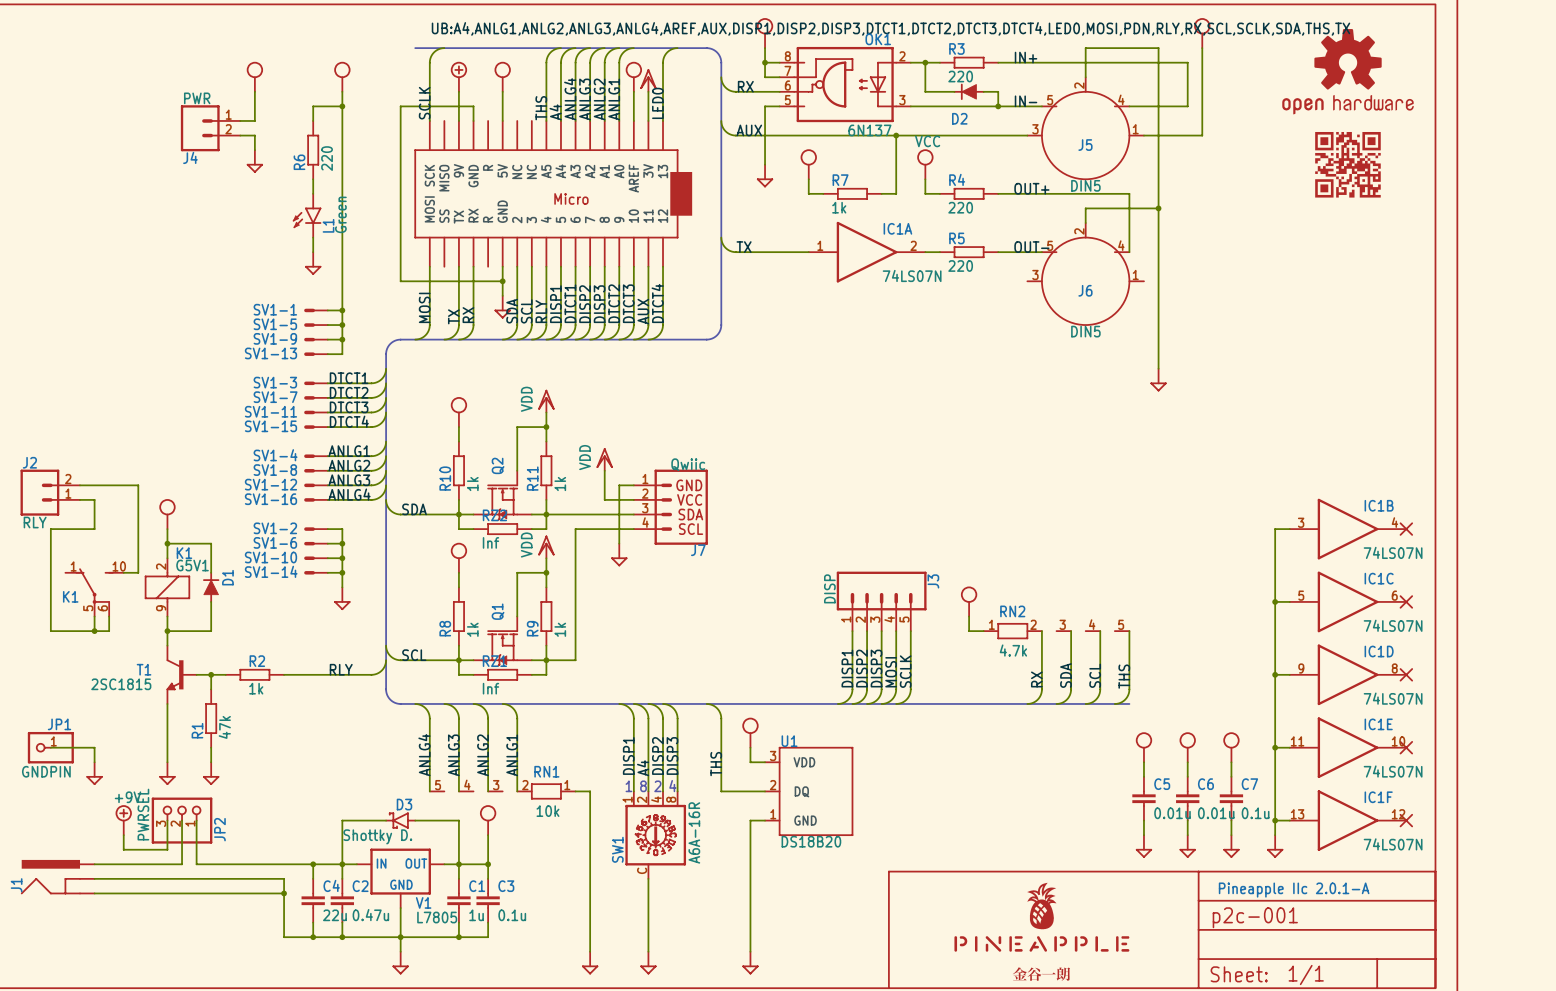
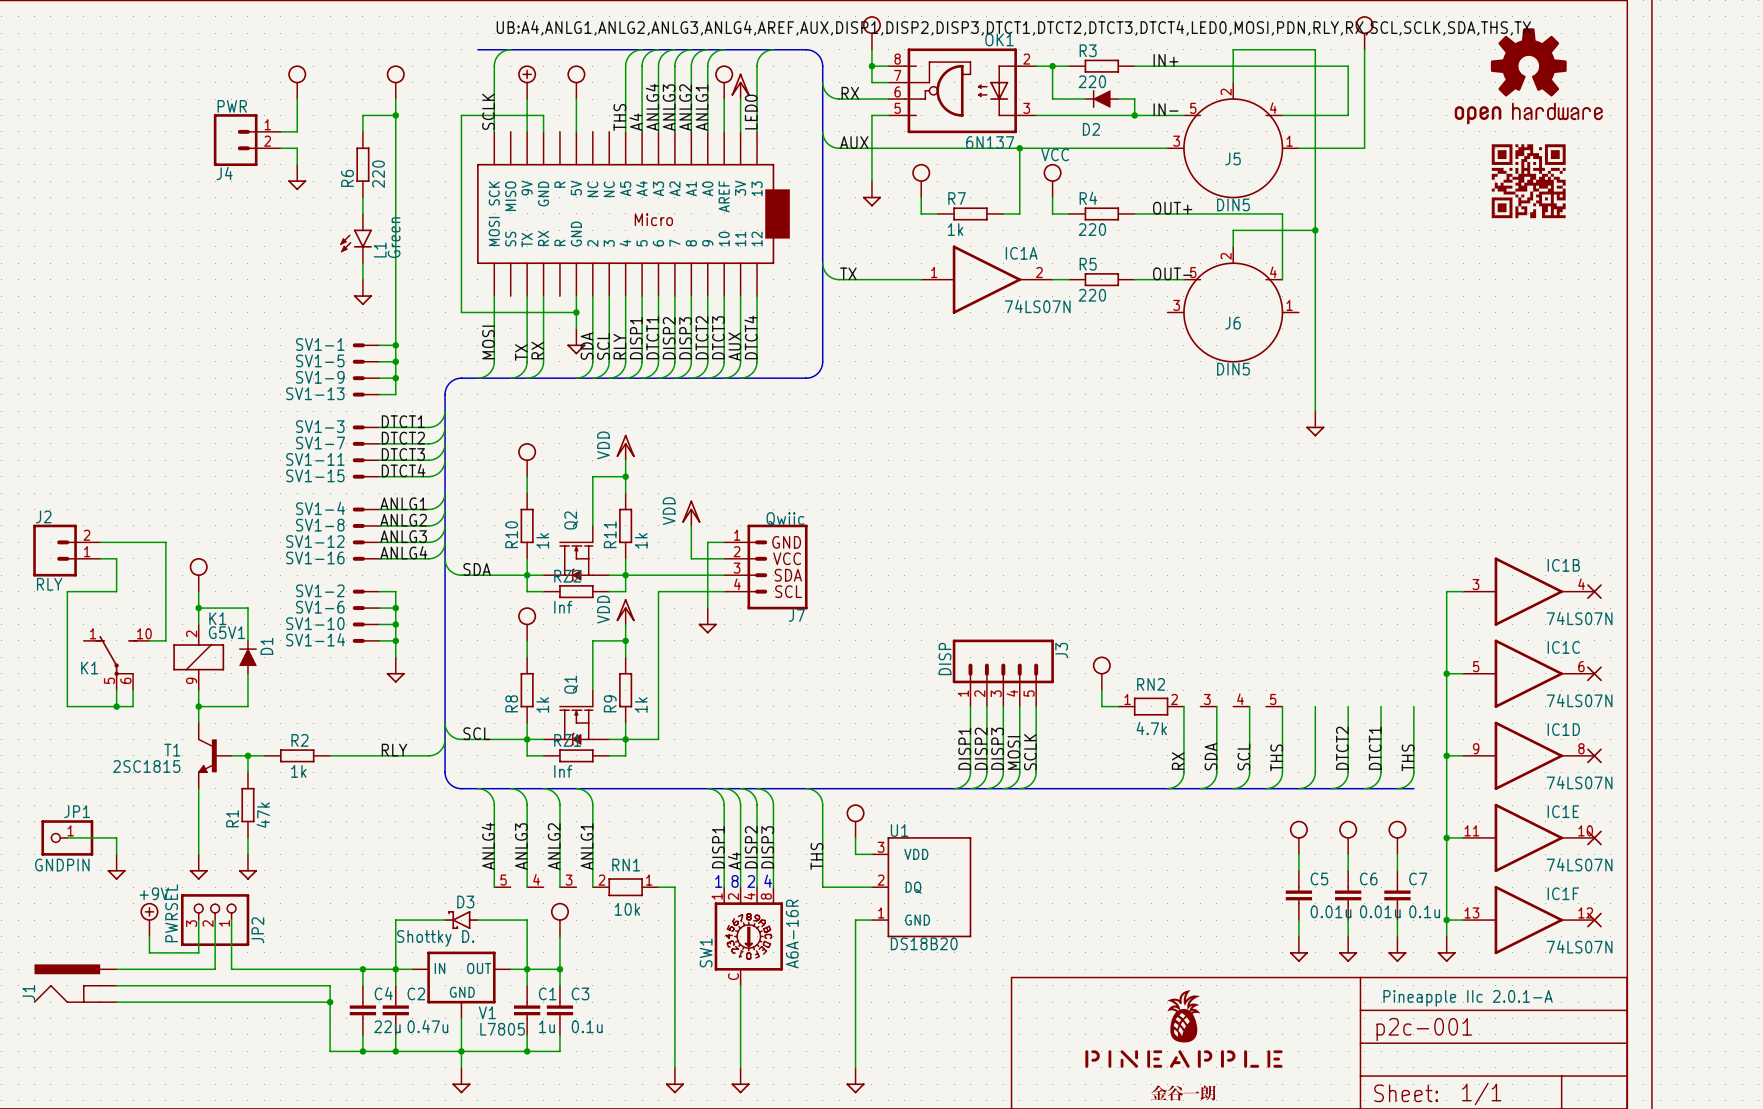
wire: none -> (1315, 706) (1314, 776) (1308, 785) (1298, 788)
wire: none -> (1348, 706) (1347, 776) (1341, 785) (1331, 788)
wire: none -> (1381, 706) (1380, 776) (1374, 785) (1364, 788)
wire: none -> (1413, 706) (1413, 776) (1407, 785) (1397, 788)
label: none -> DTCT2 (1342, 748)
label: none -> DTCT1 (1375, 748)
label: none -> THS (1408, 757)
bus: none -> (1282, 788) (1413, 788)

